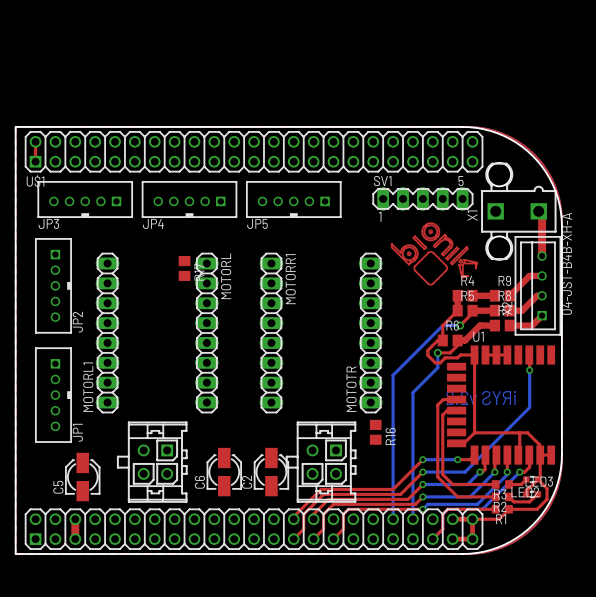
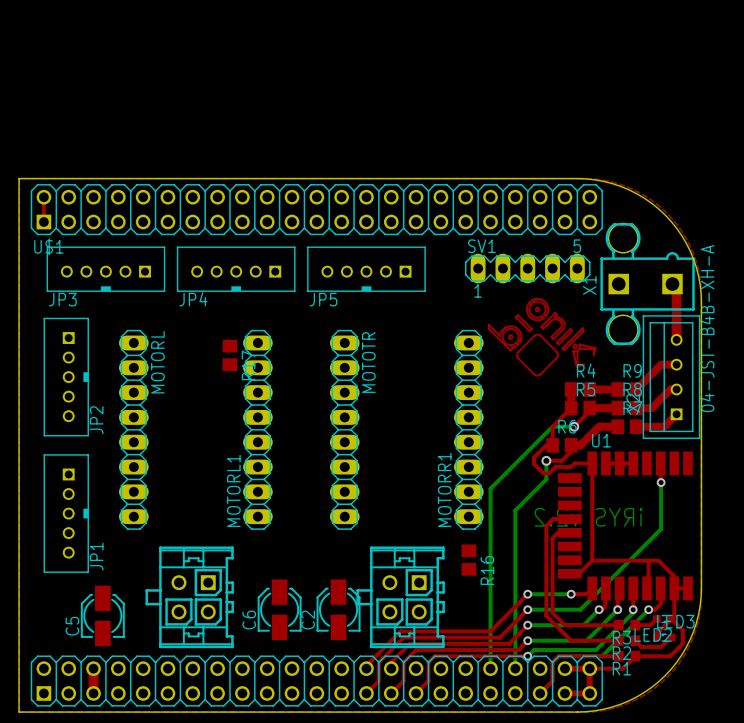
MOTORR1 name position: MOTORR1 (290, 279) -> MOTORR1 (444, 489)
MOTORL1 position: (107, 333) -> (257, 429)
MOTORL position: (206, 333) -> (133, 429)
MOTORR1 position: (271, 333) -> (468, 429)
MOTOTR position: (370, 333) -> (344, 429)
MOTOTR name position: MOTOTR (351, 389) -> MOTOTR (368, 362)

